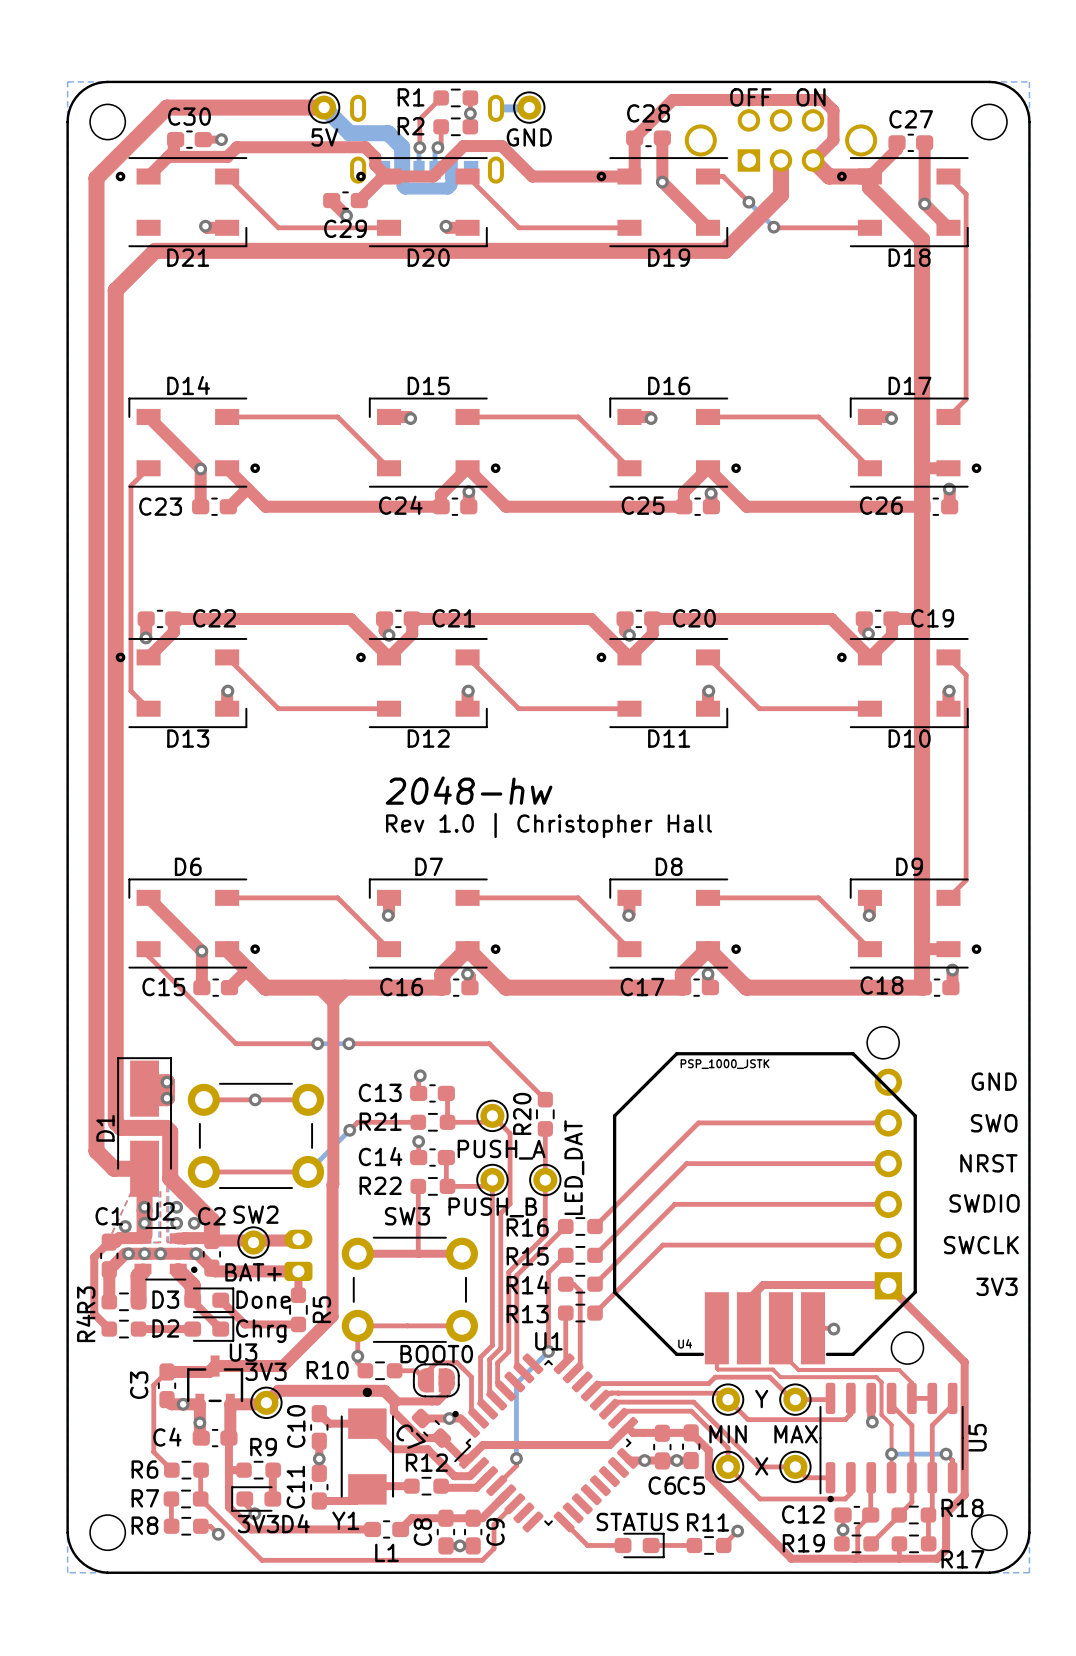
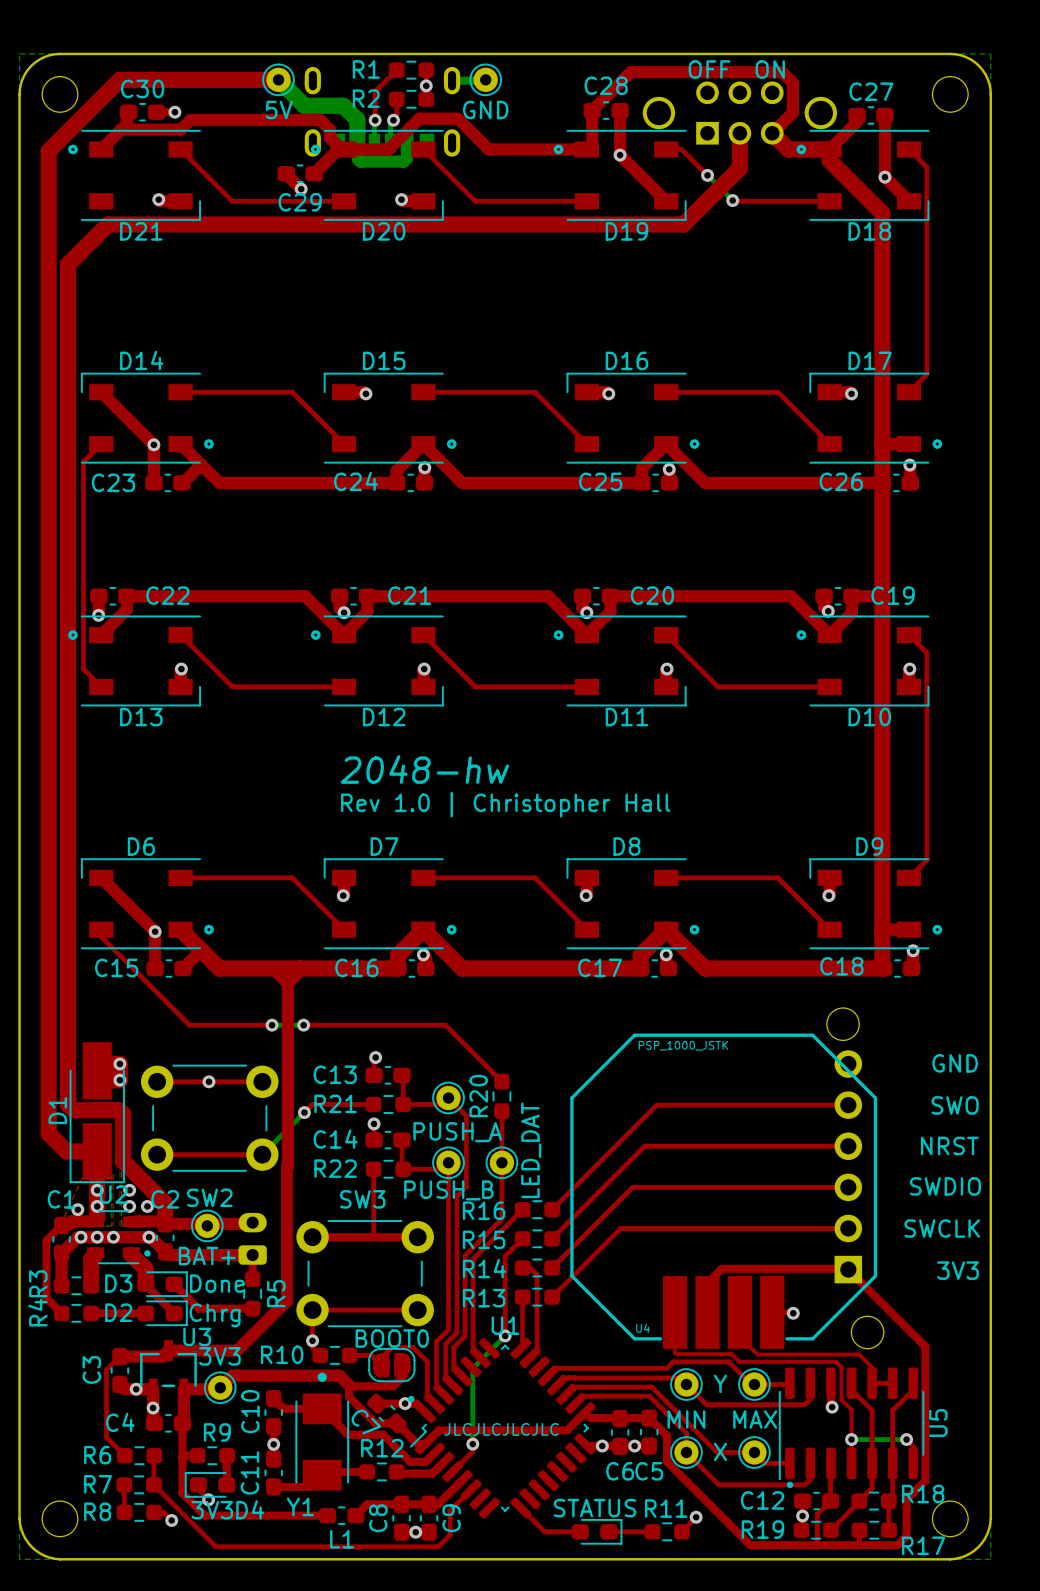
D1 rotation: 0° (144, 1127) -> 180° (97, 1112)
text: none -> JLCJLCJLCJLC (501, 1429)

